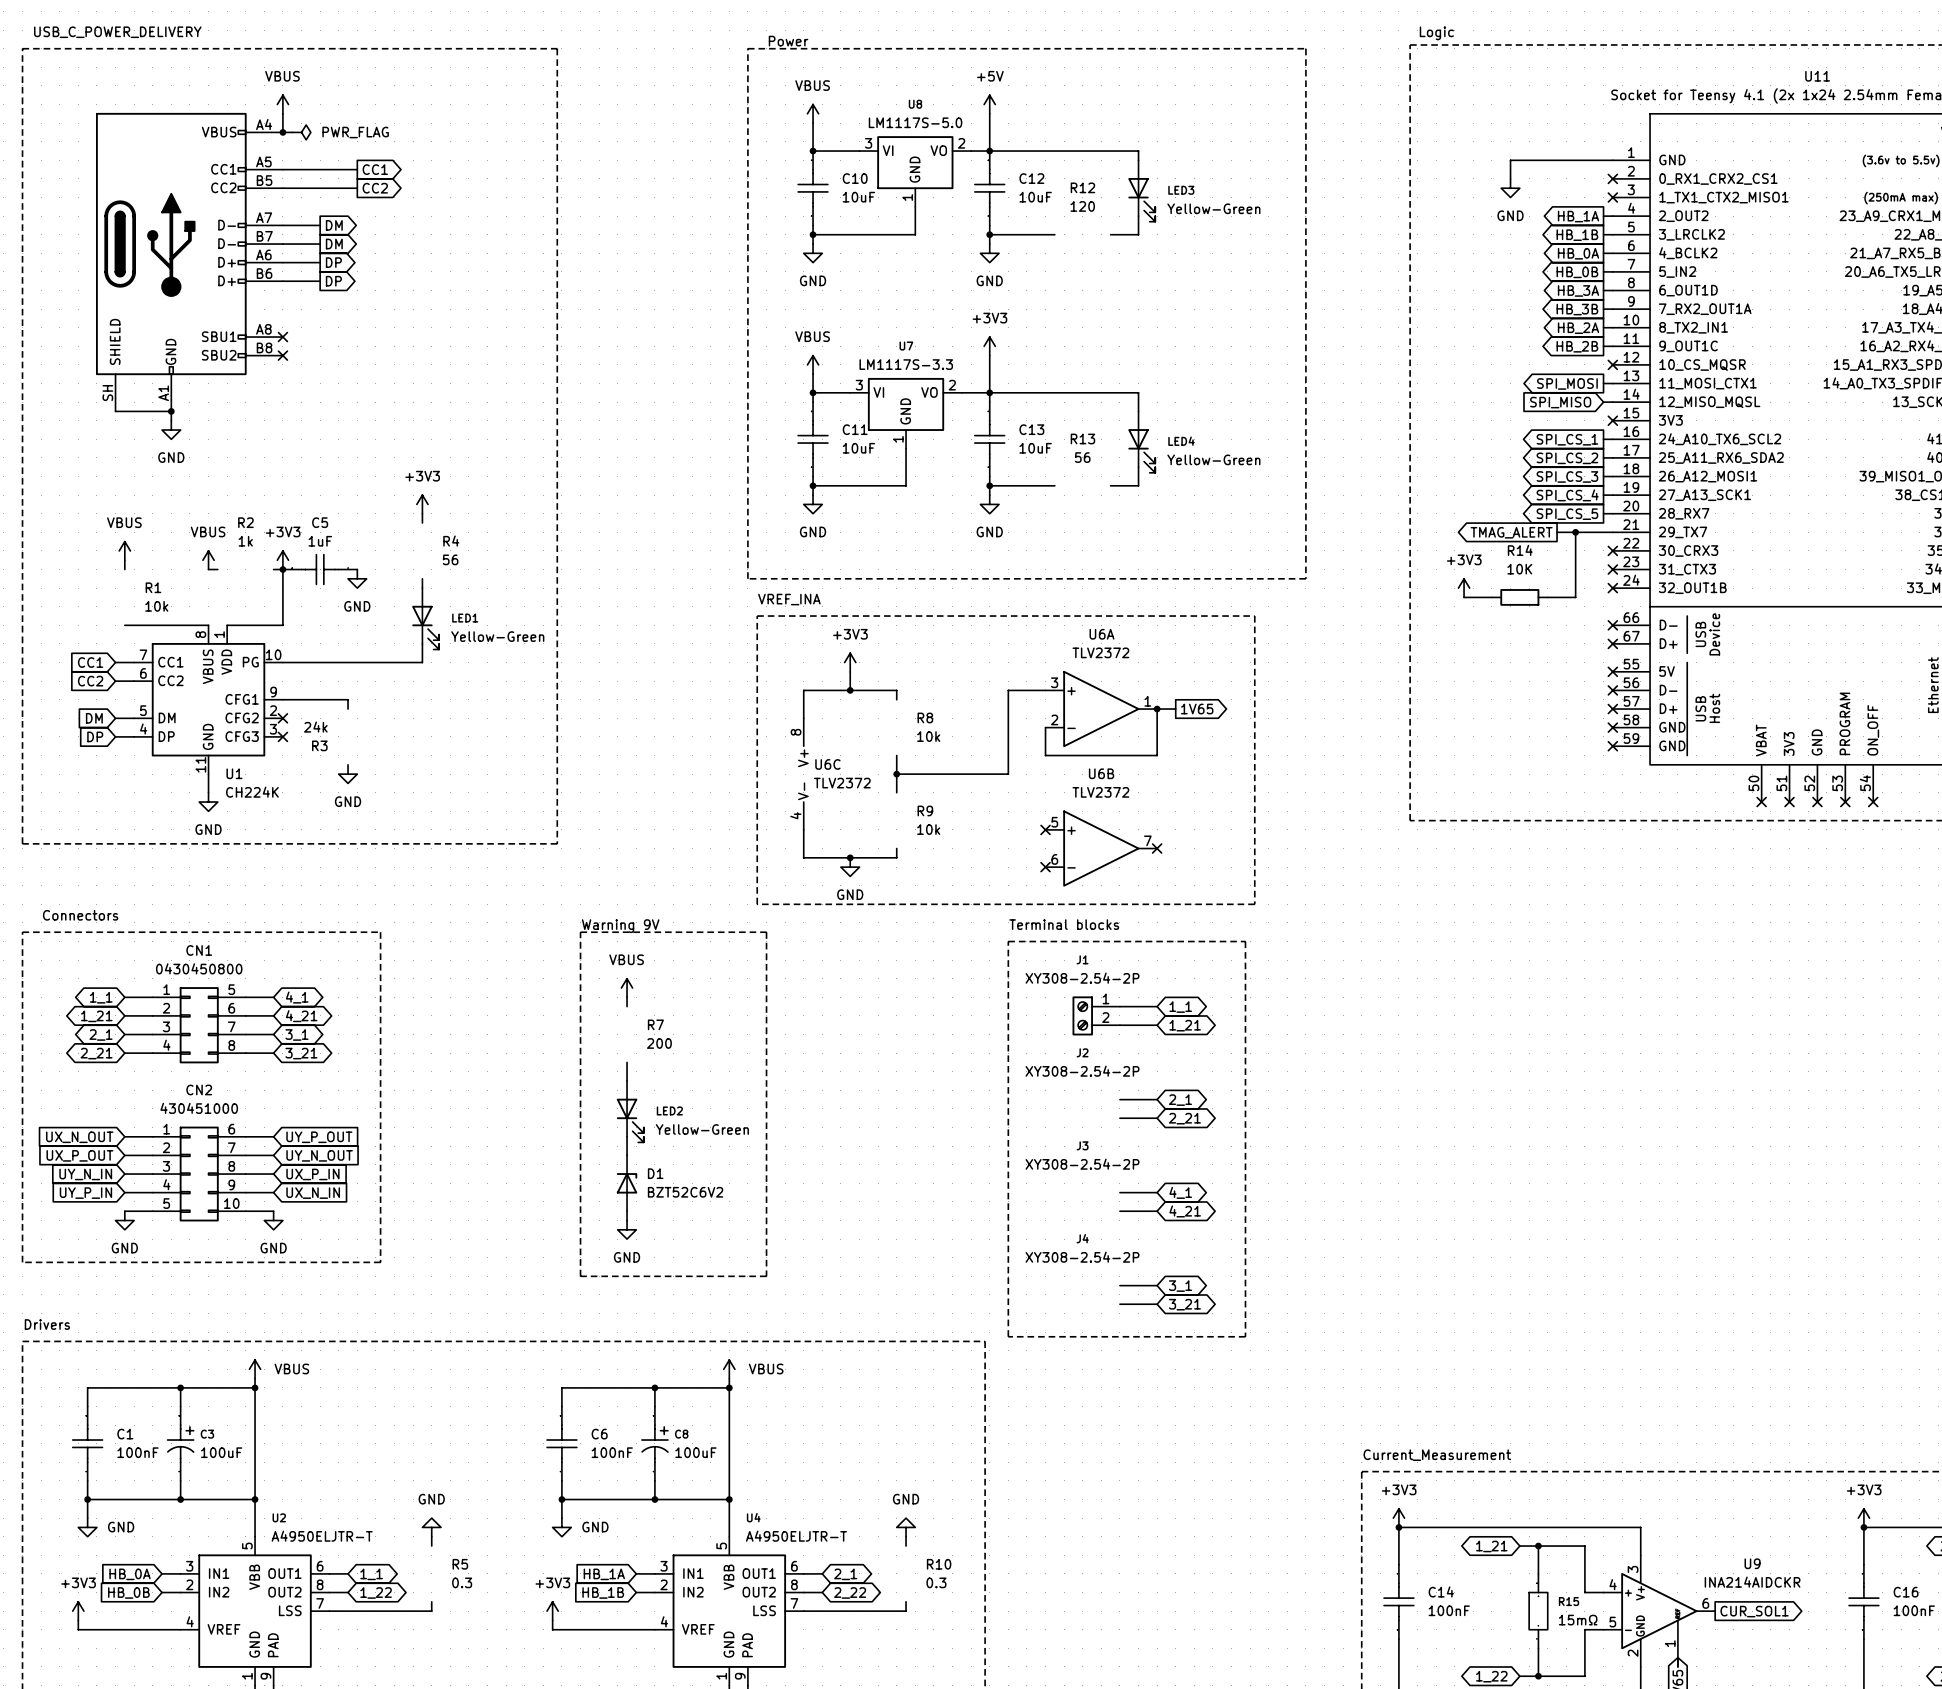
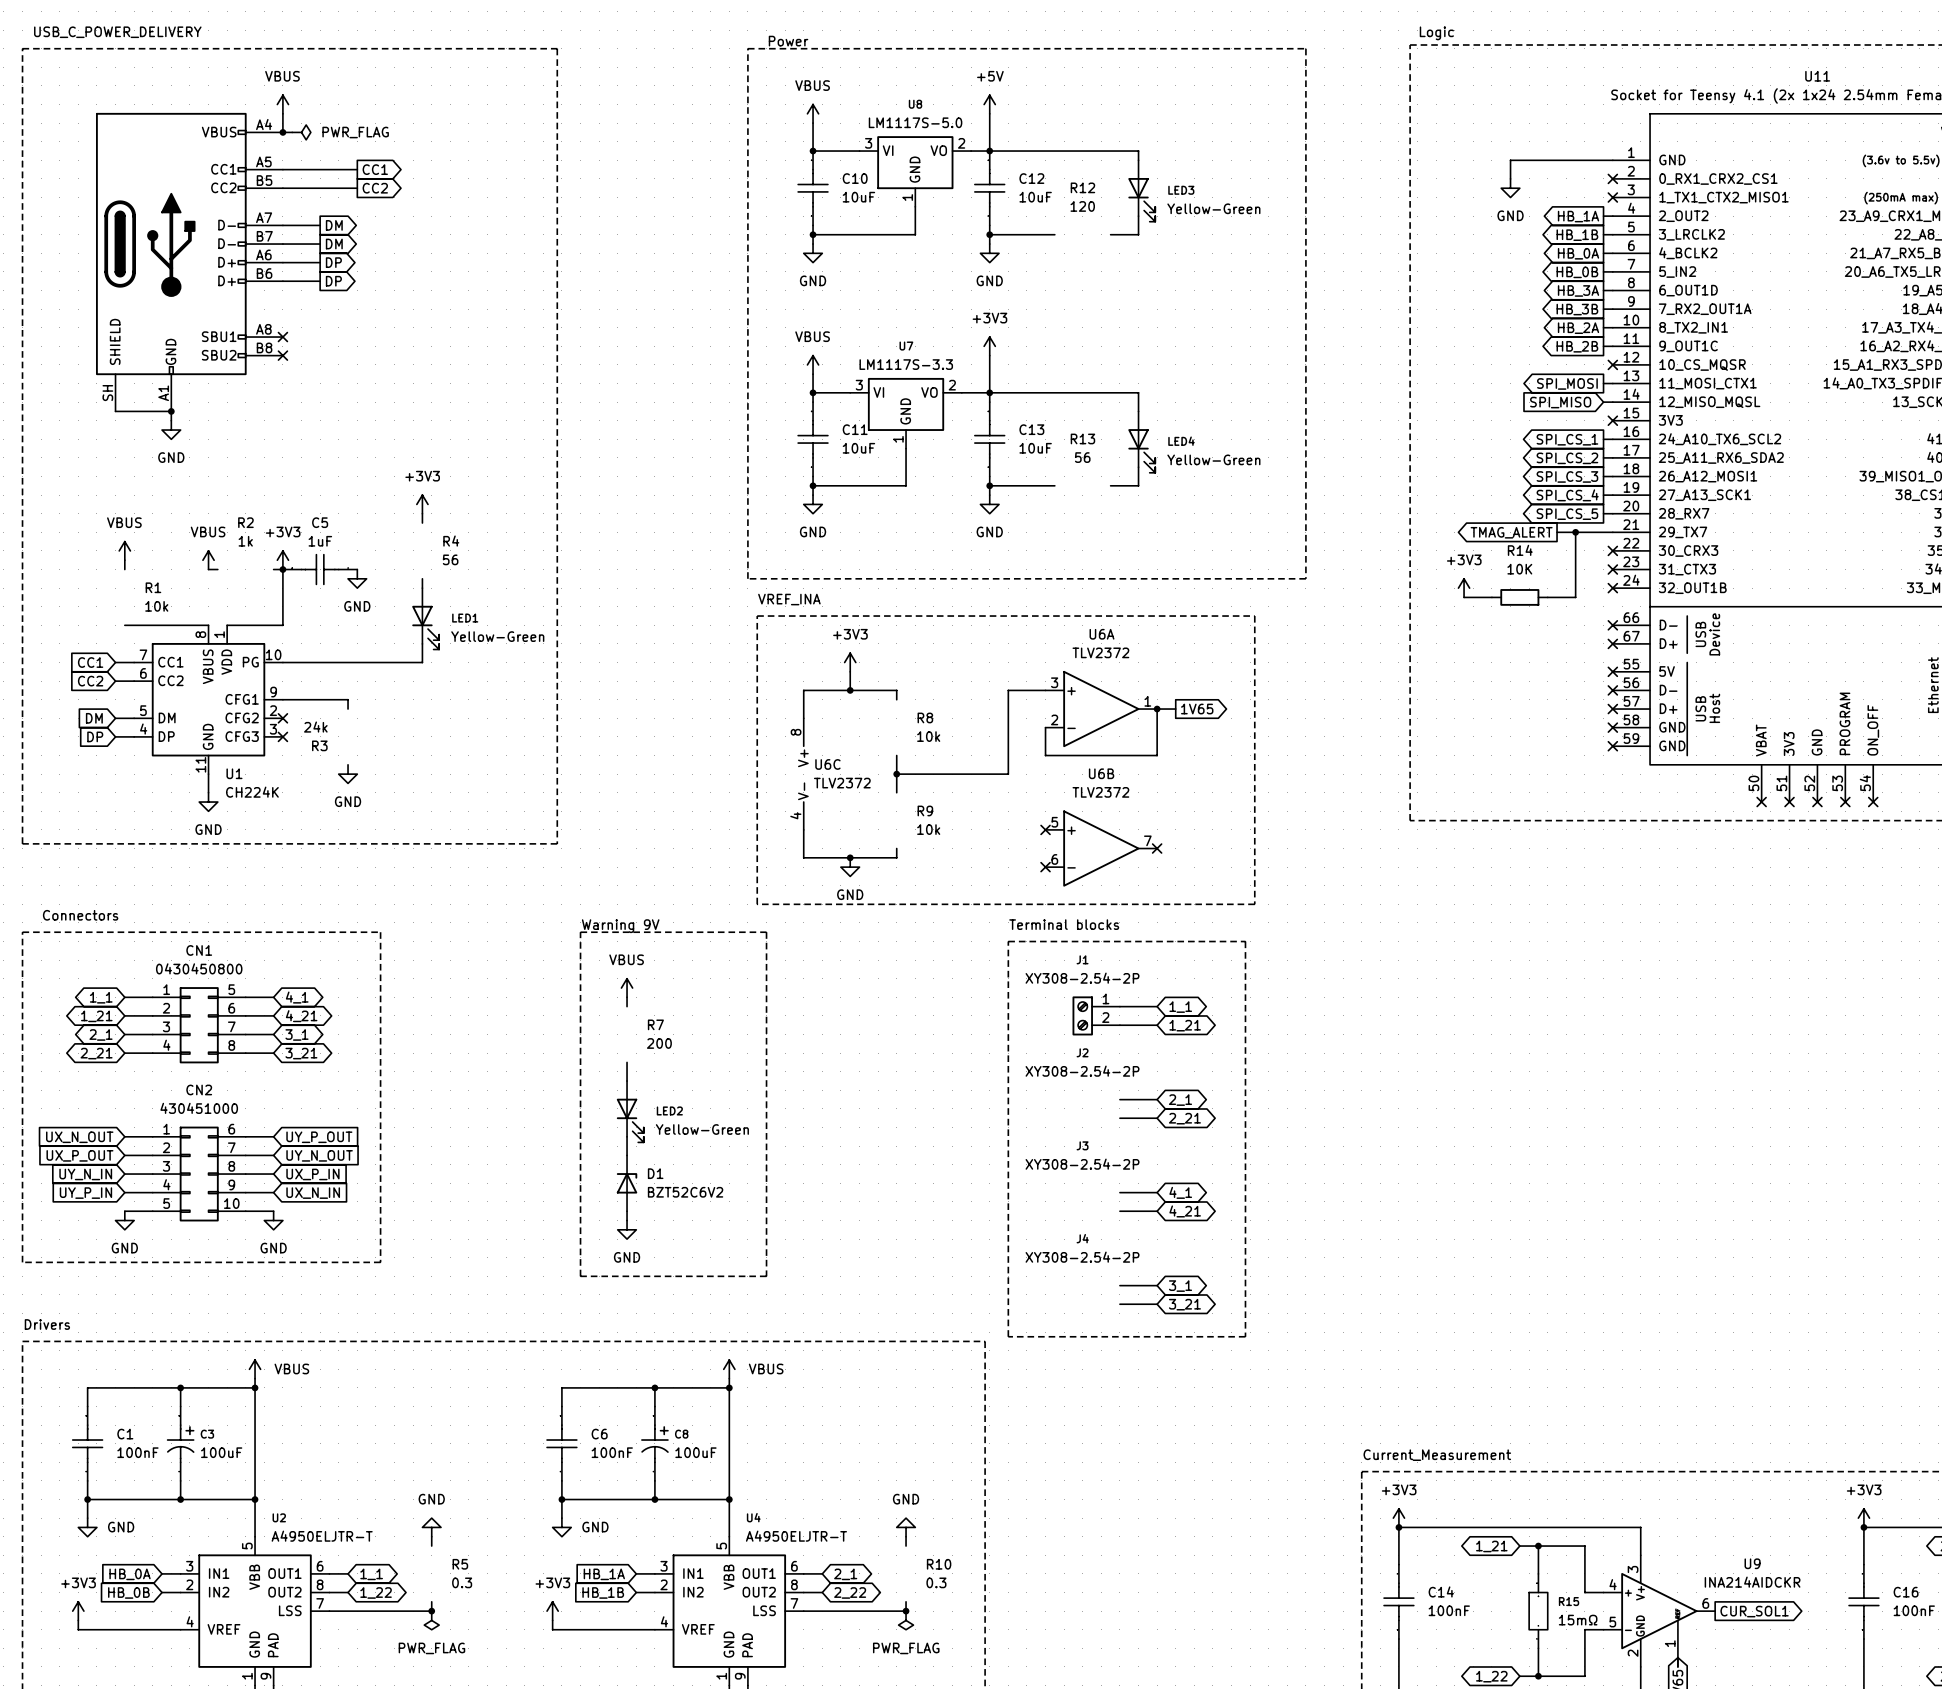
junction: none -> (431, 1611)
junction: none -> (906, 1611)
power symbol: none -> PWR_FLAG (431, 1620)
power symbol: none -> PWR_FLAG (906, 1620)

